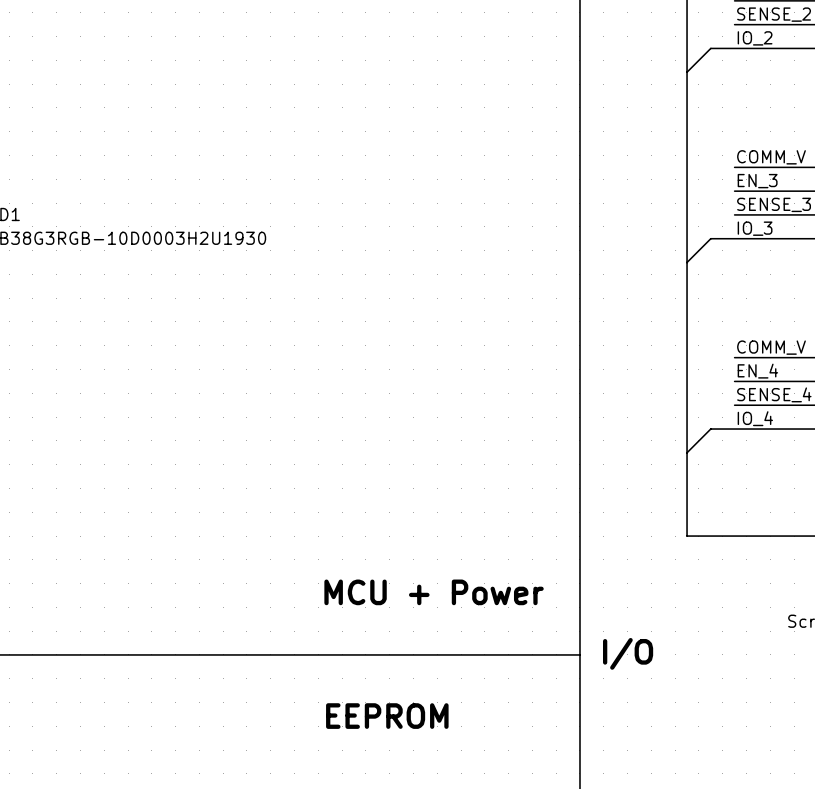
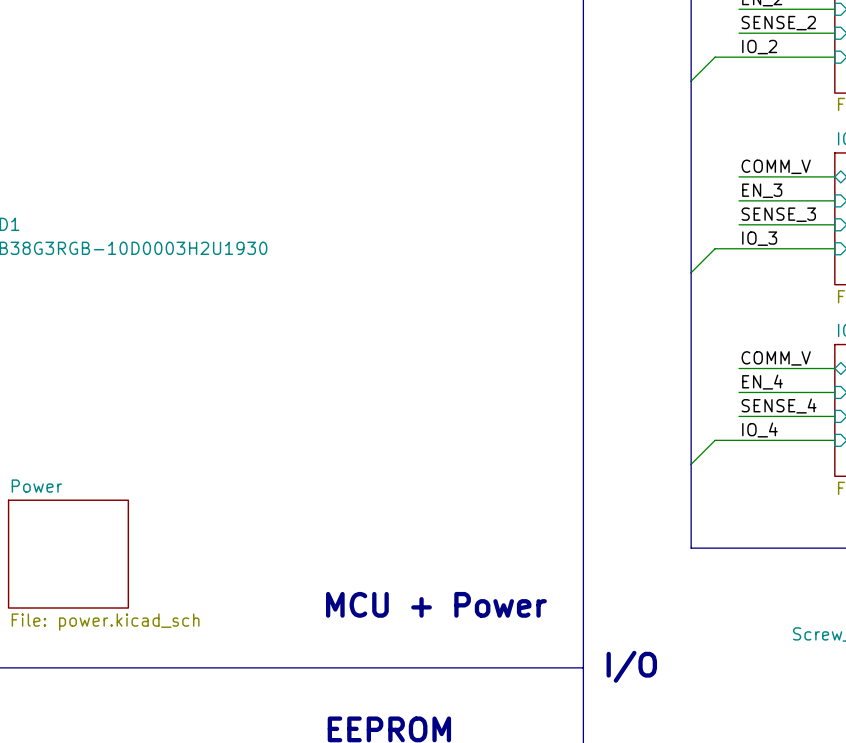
sheet Power: none -> File: power.kicad_sch (68, 554)

